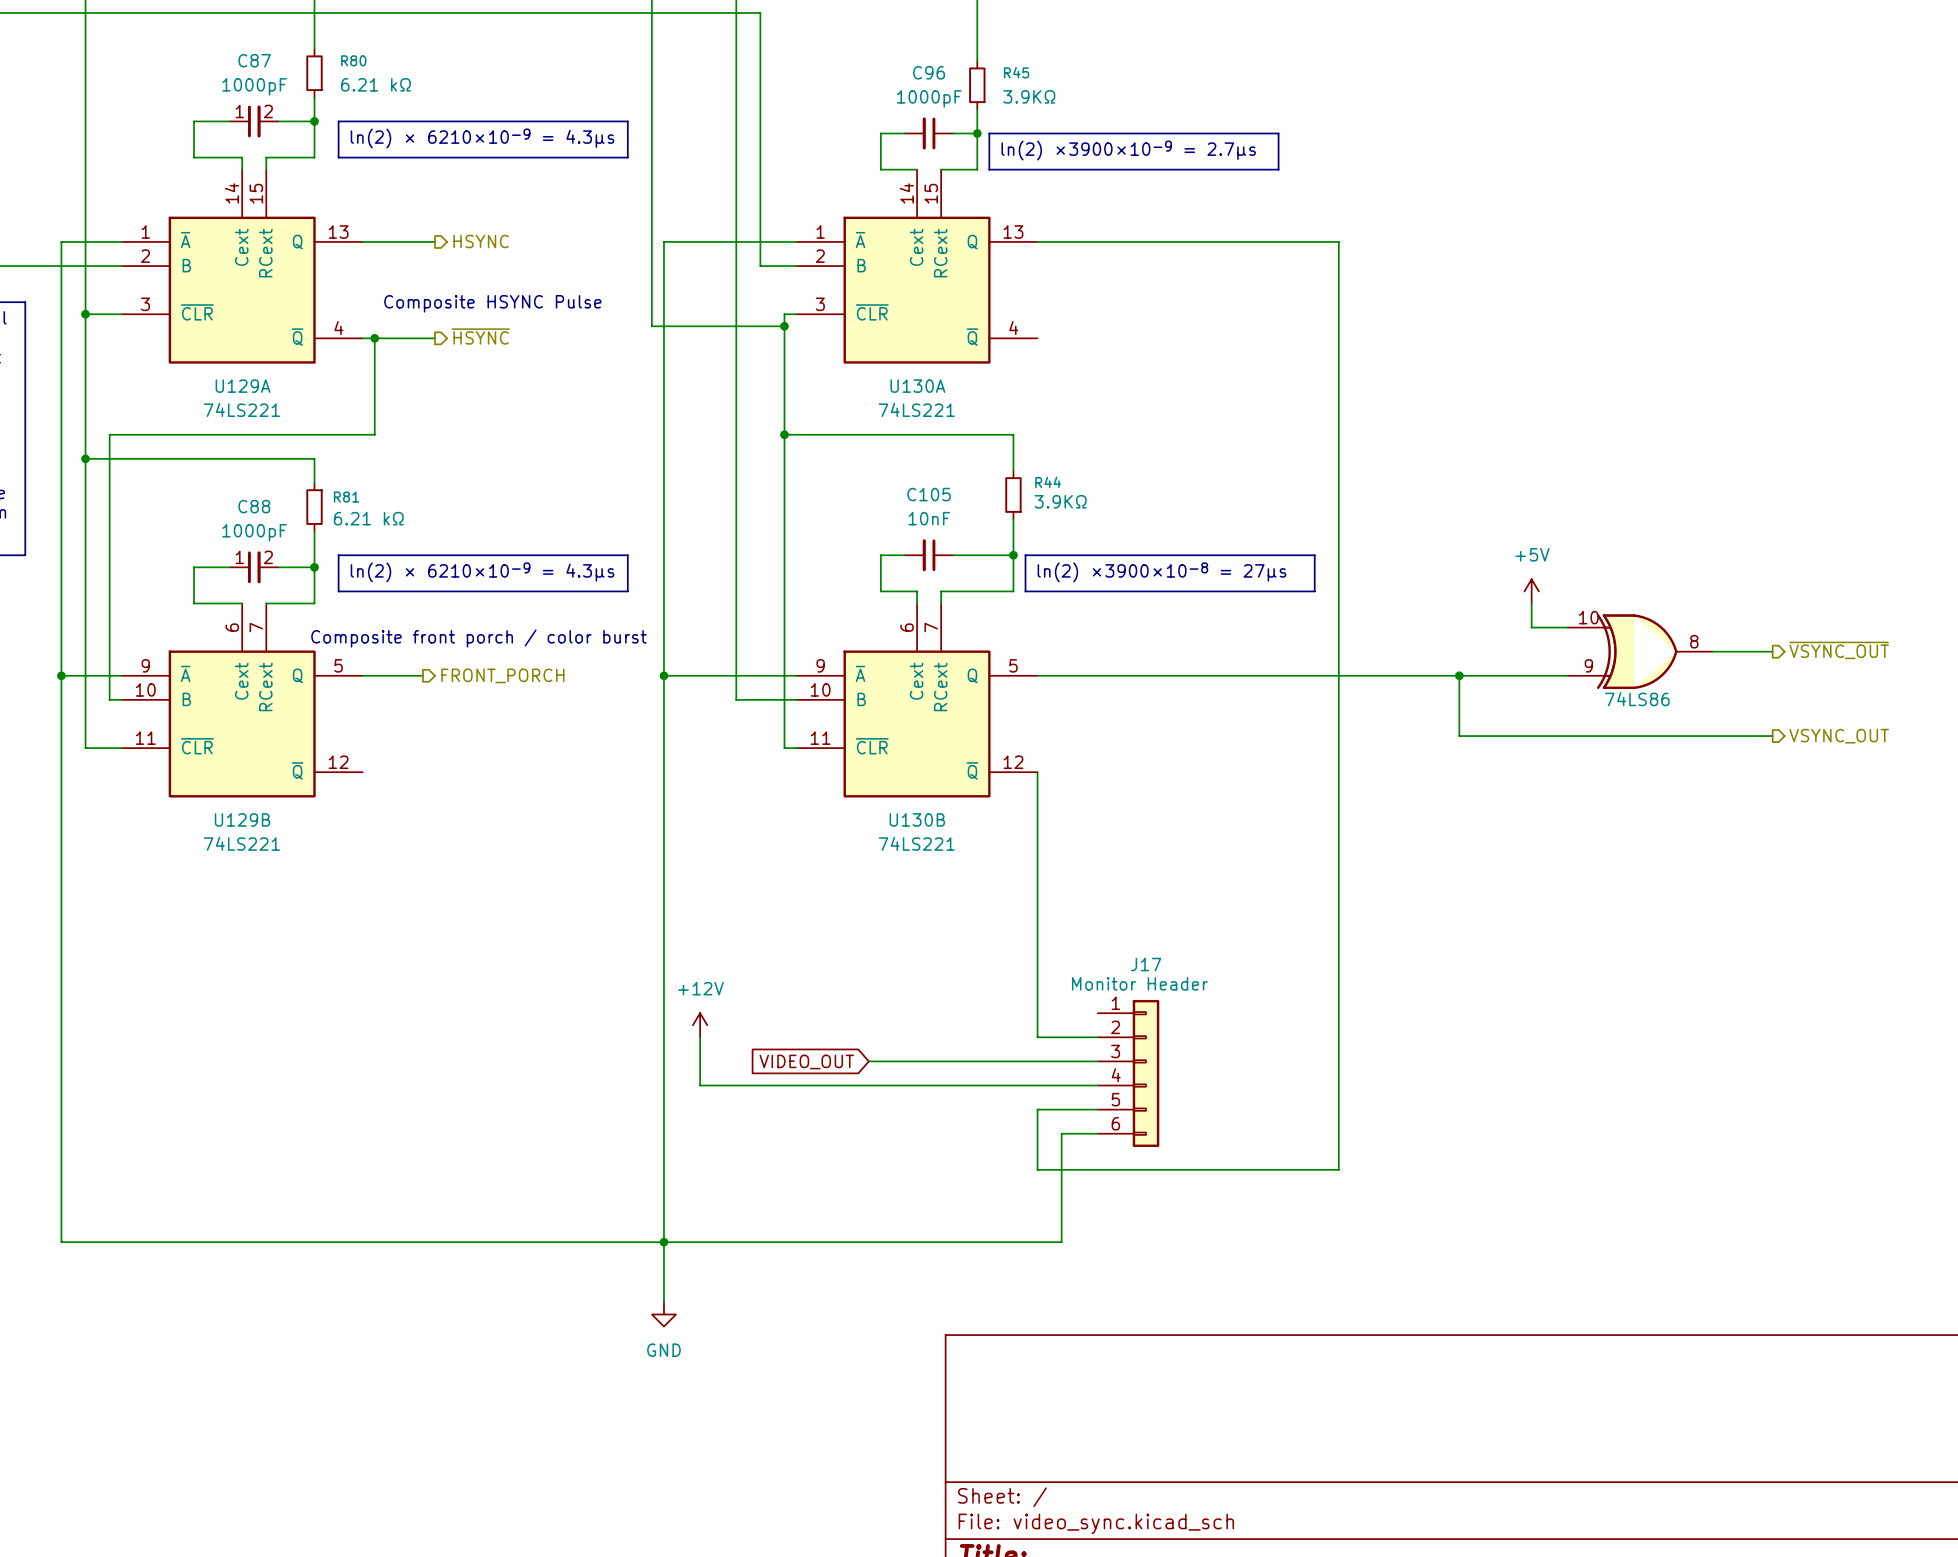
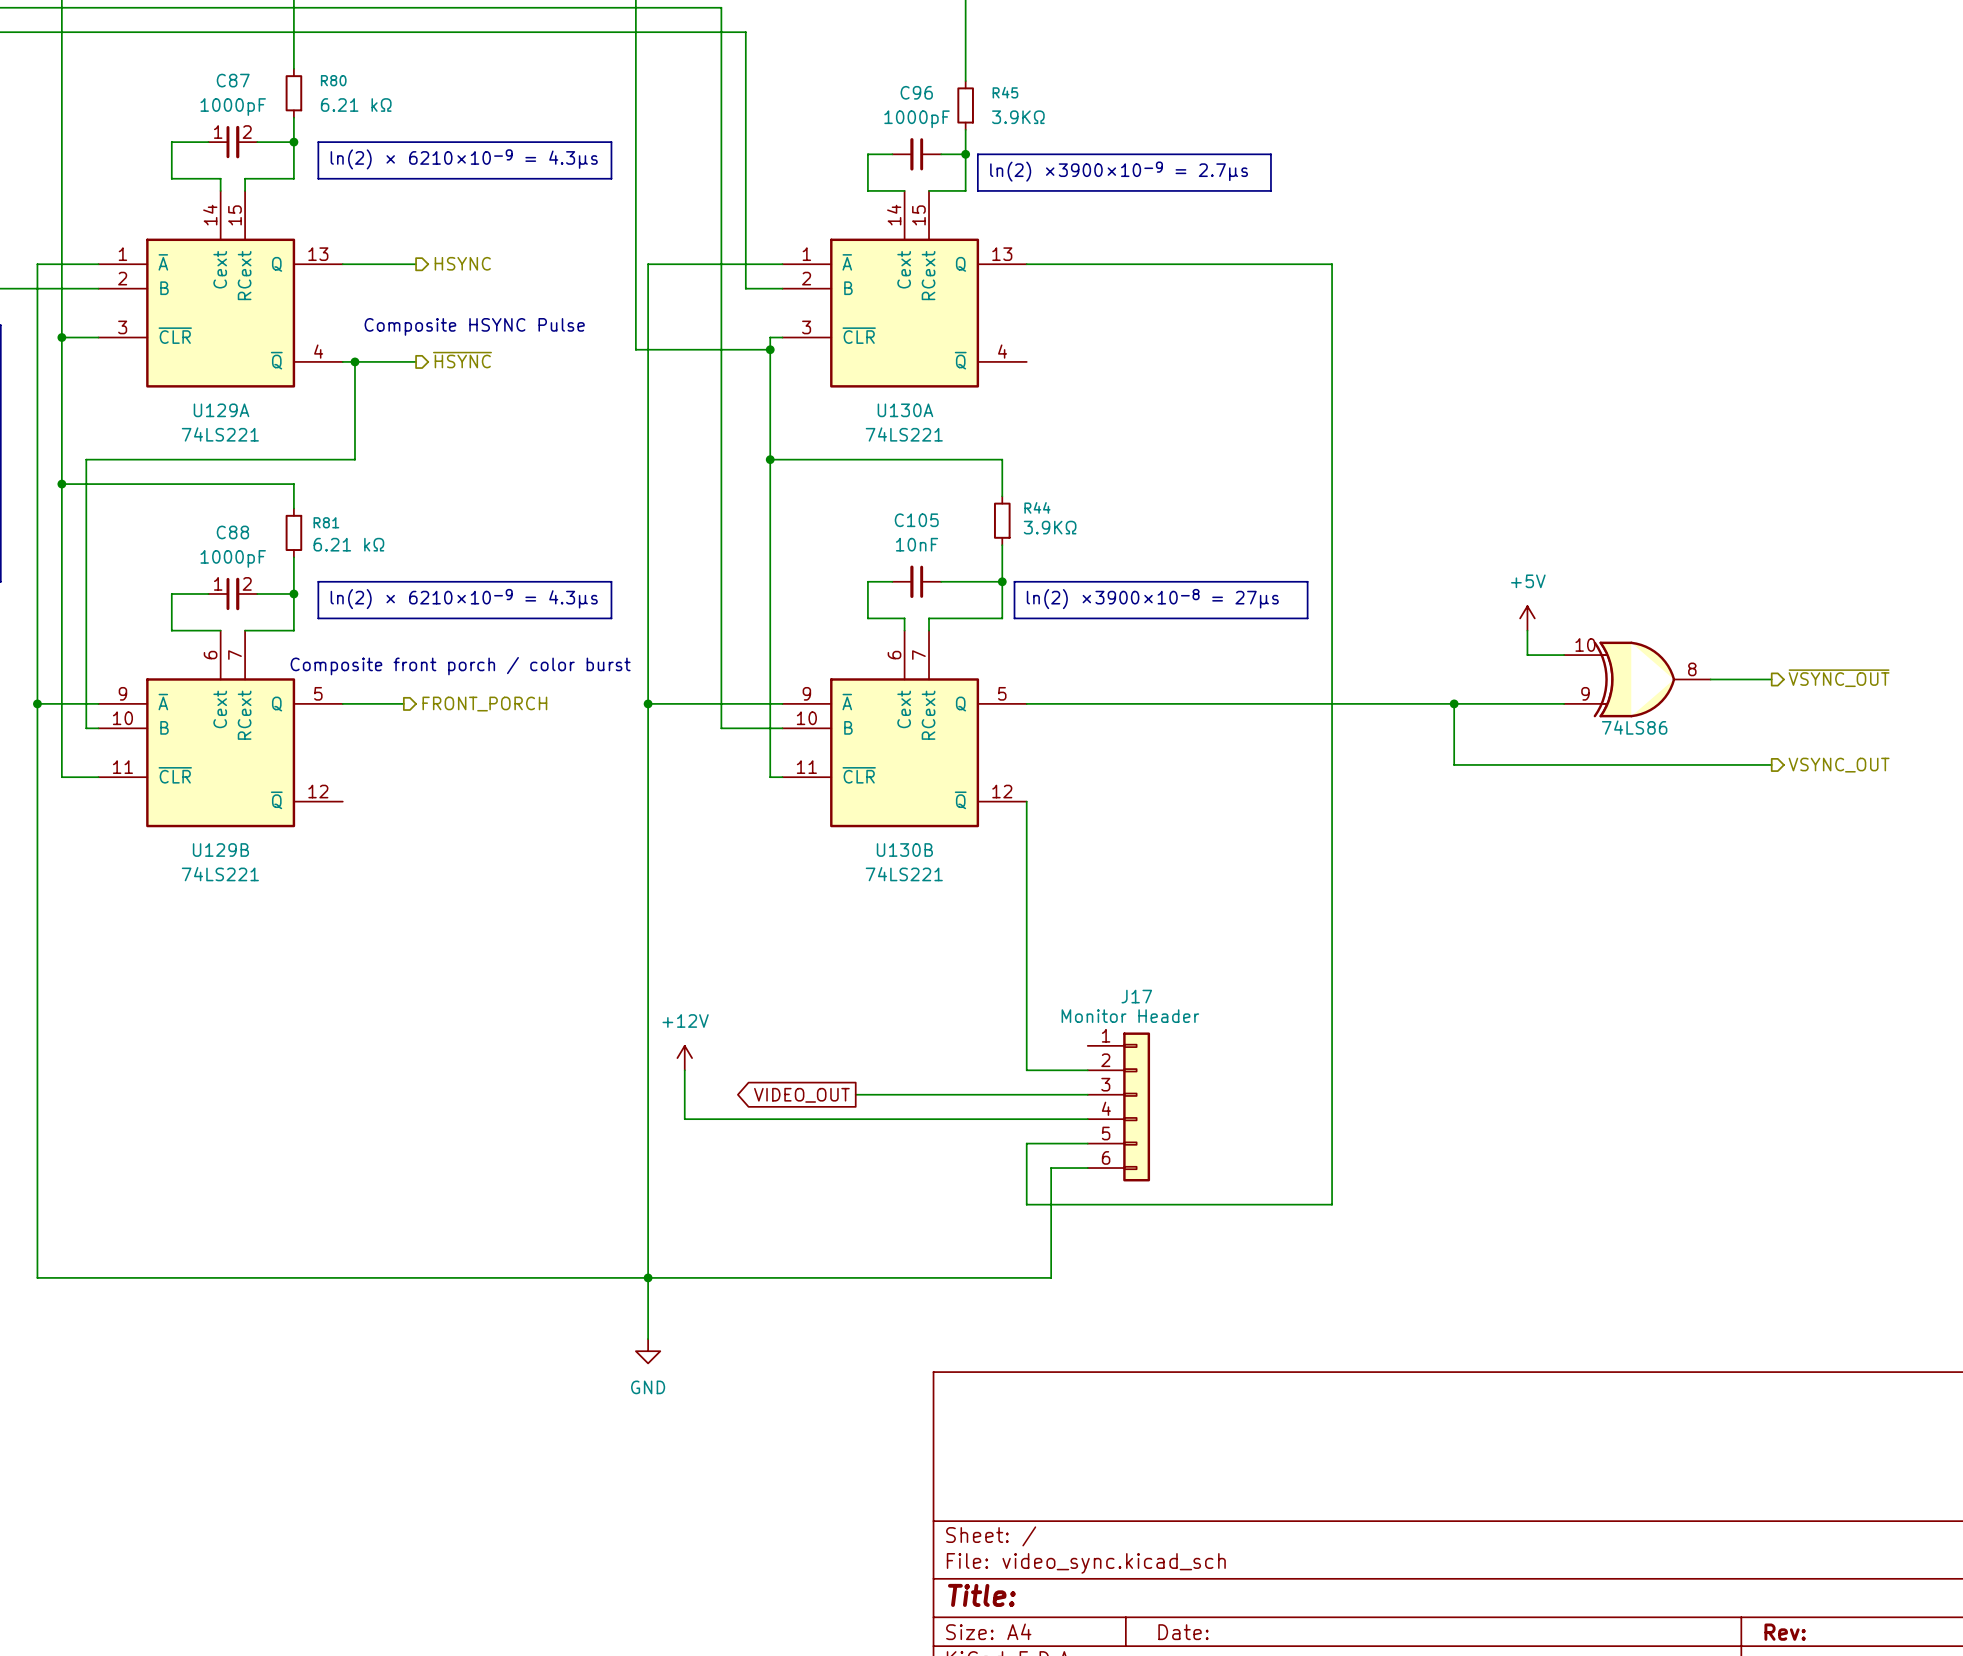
global label shape: input (806, 1061) -> output (801, 1095)

